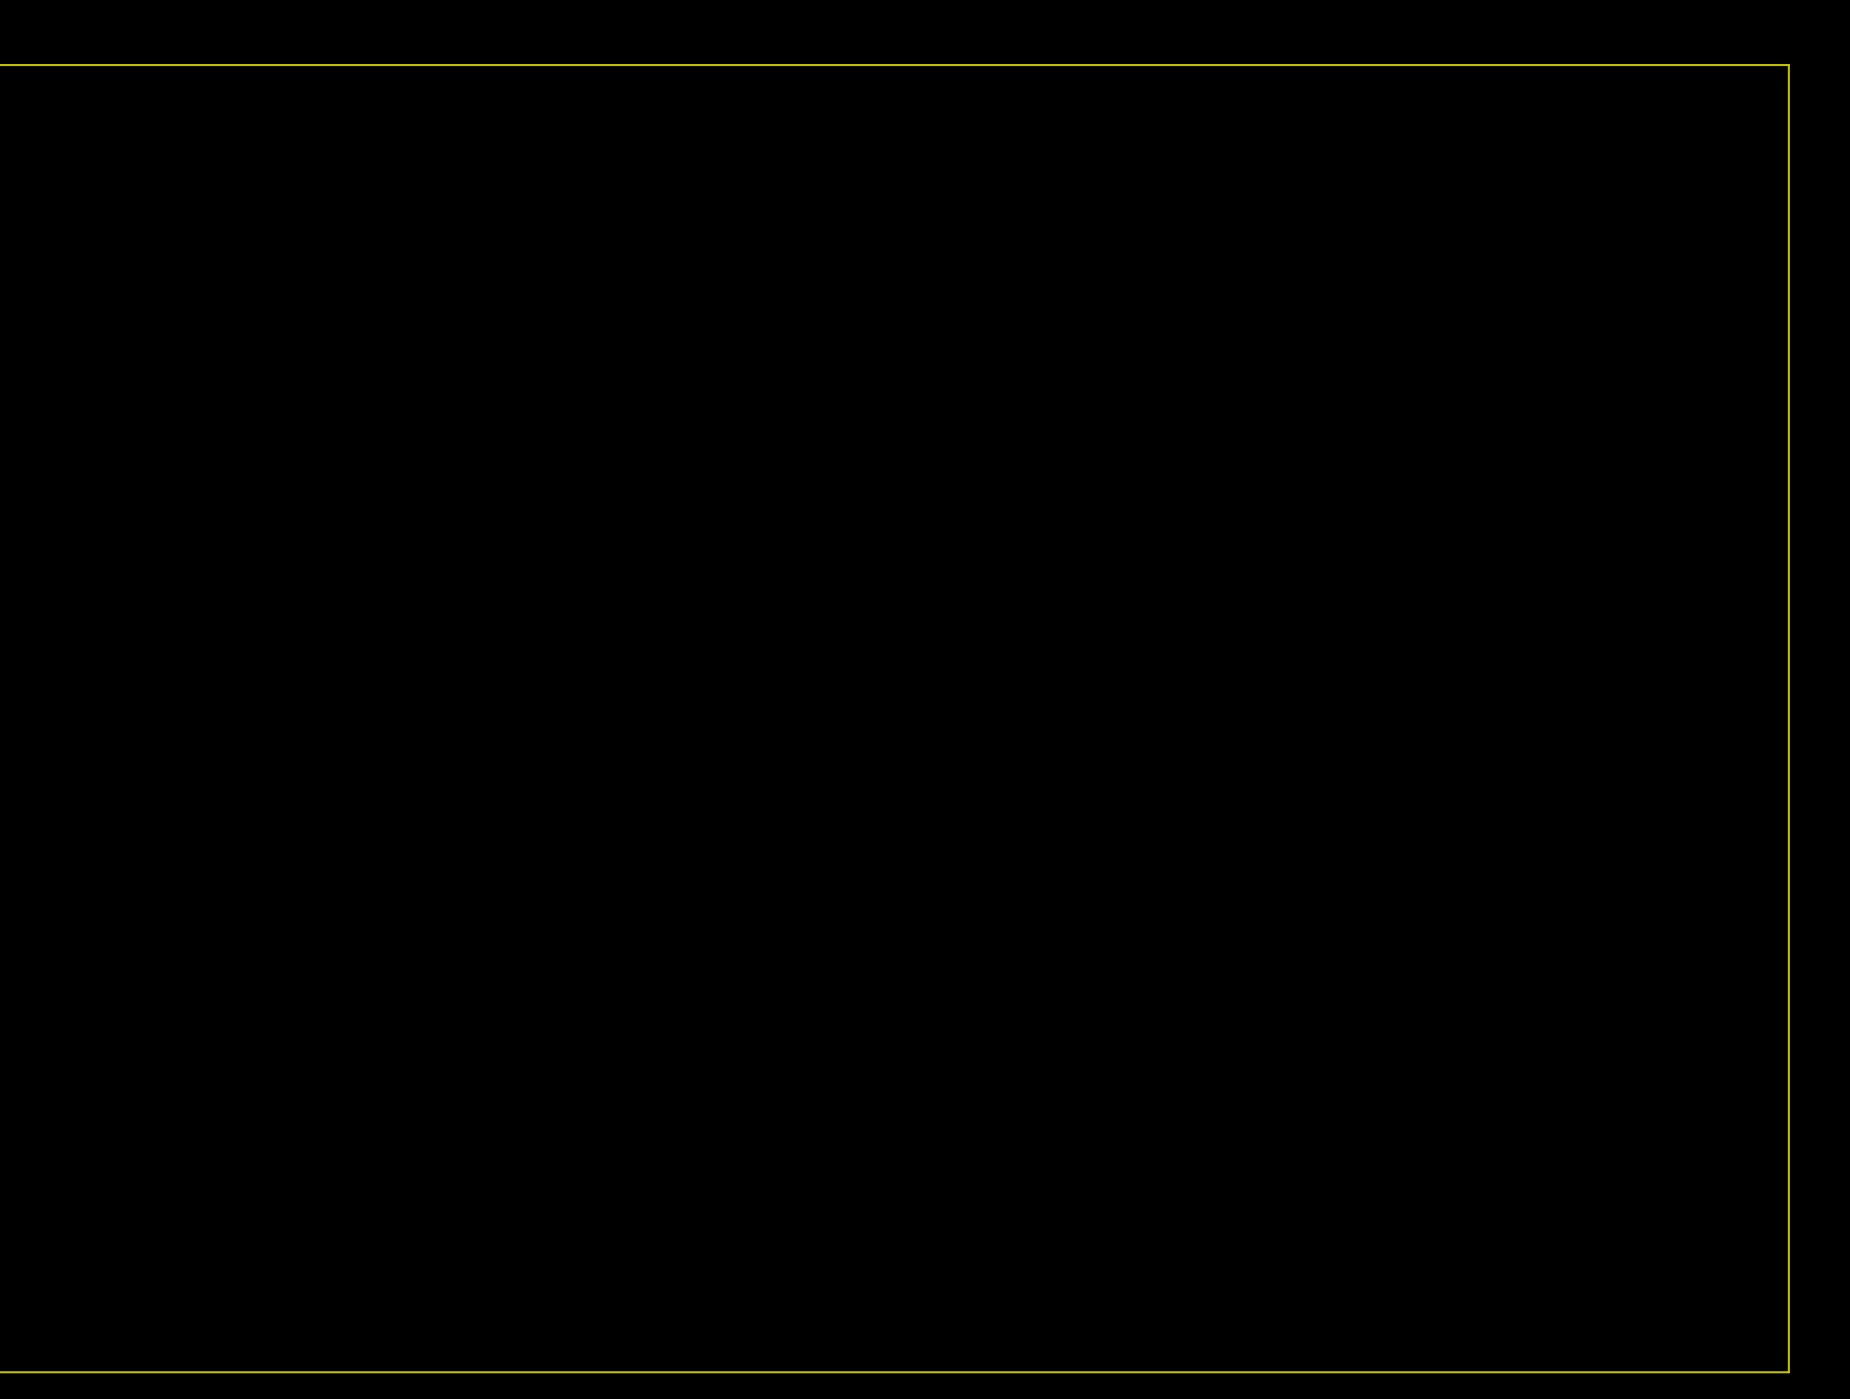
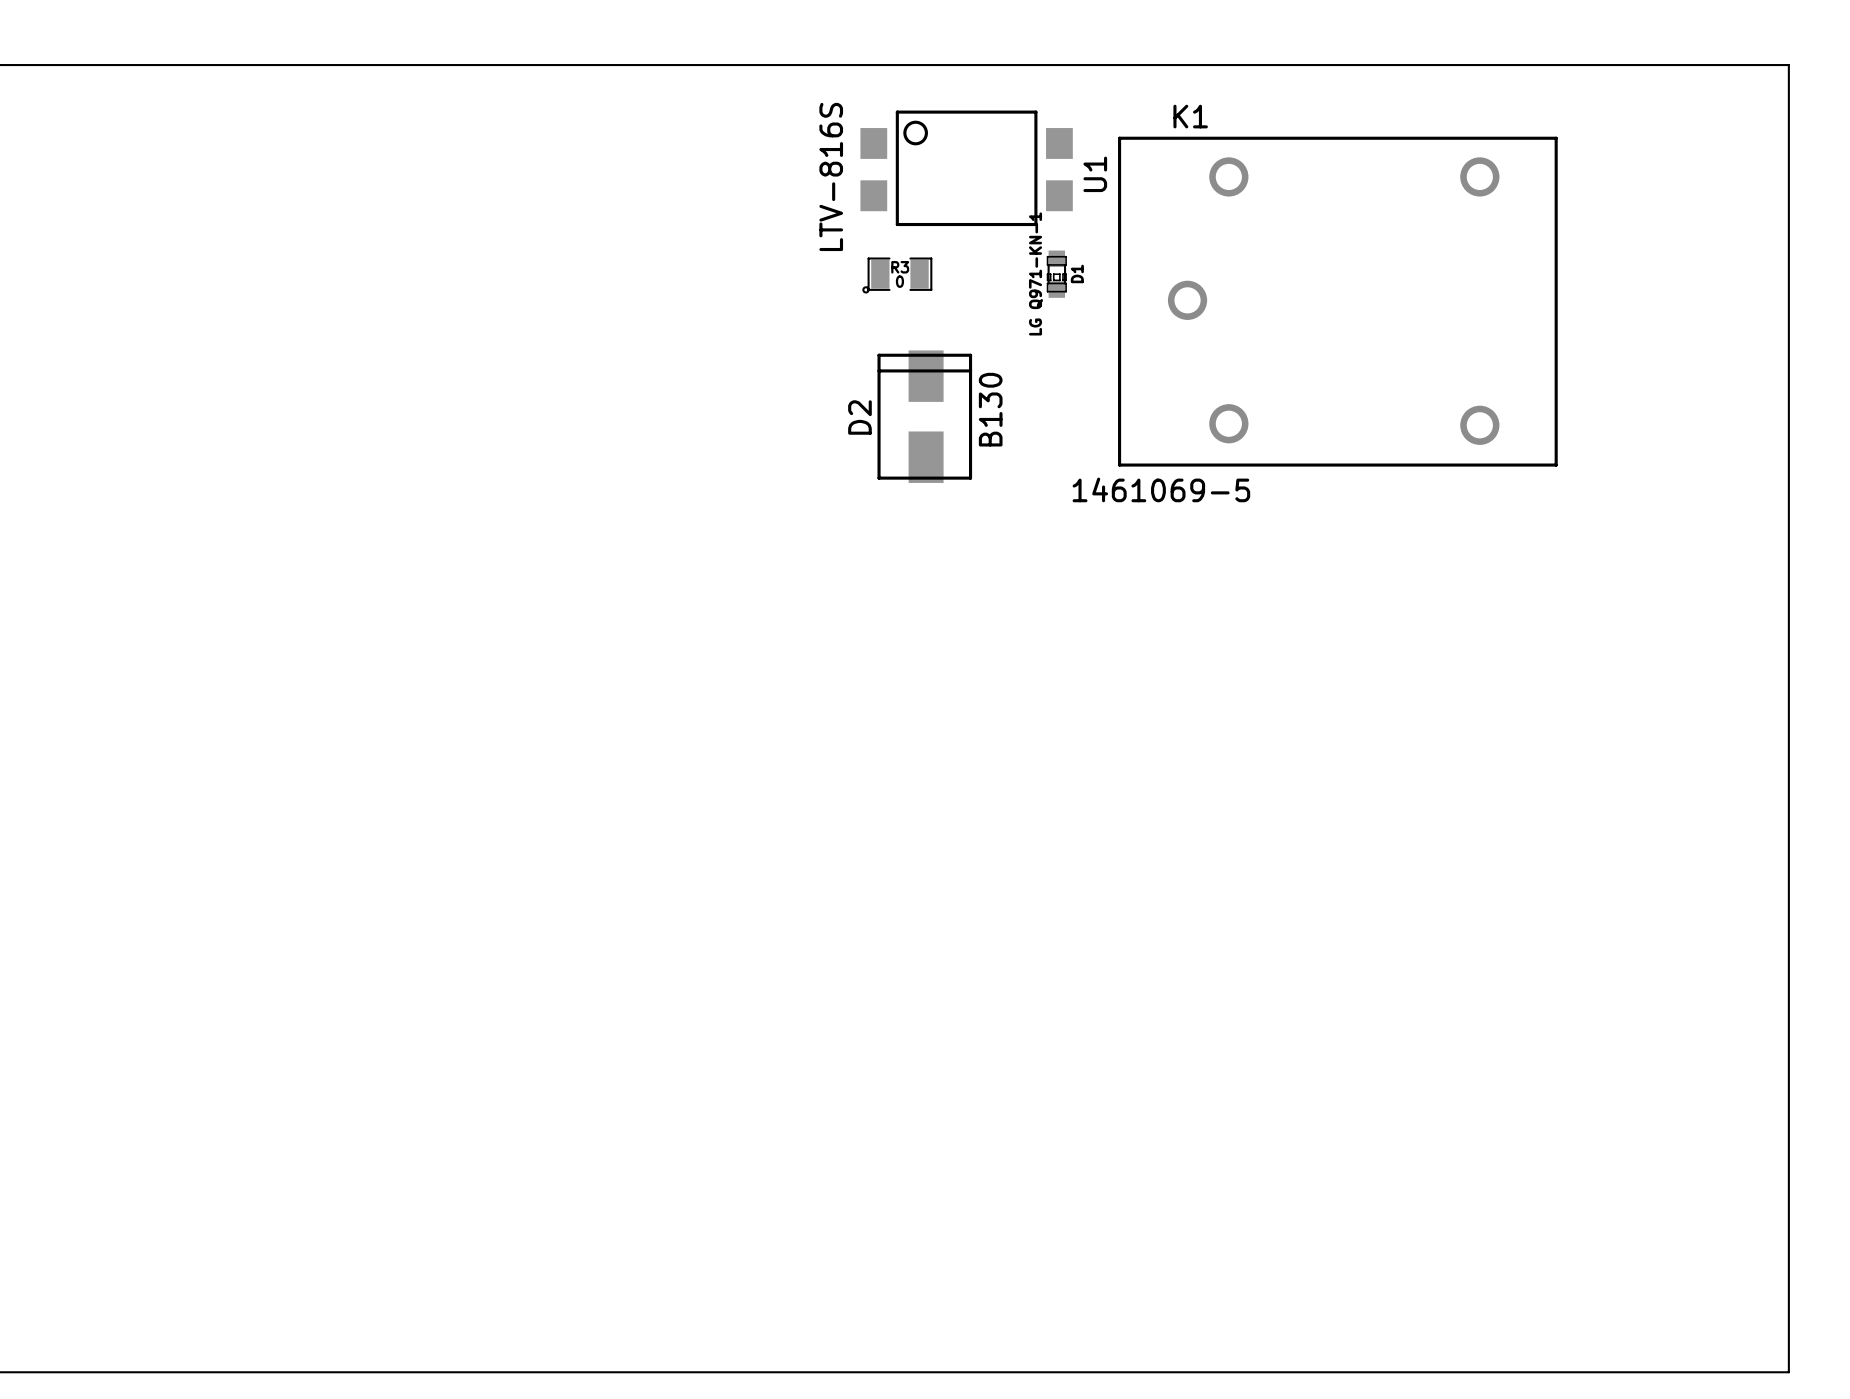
U1: none -> LTV-816S (966, 168)
D1: none -> LG Q971-KN-1 (1056, 274)
R3: none -> 0 (897, 275)
K1: none -> 1461069-5 (1337, 301)
D2: none -> B130 (924, 416)

